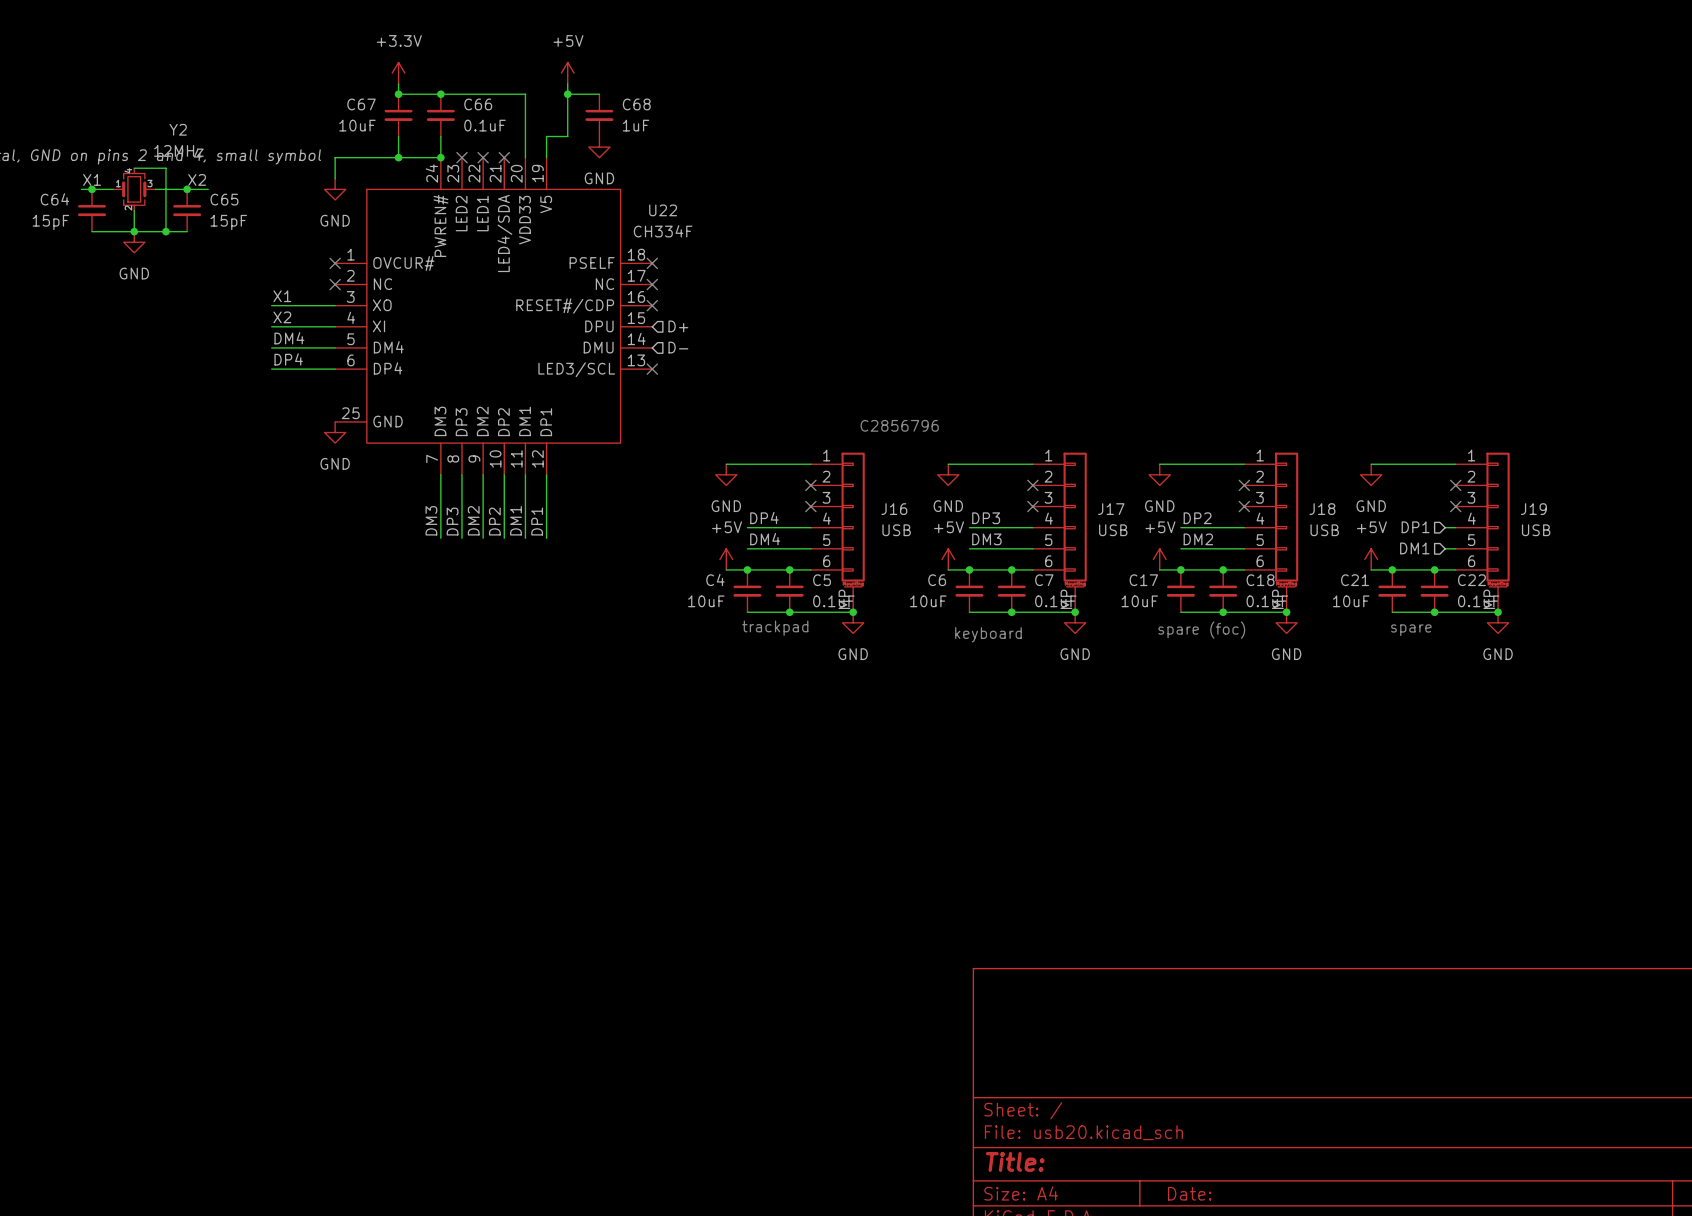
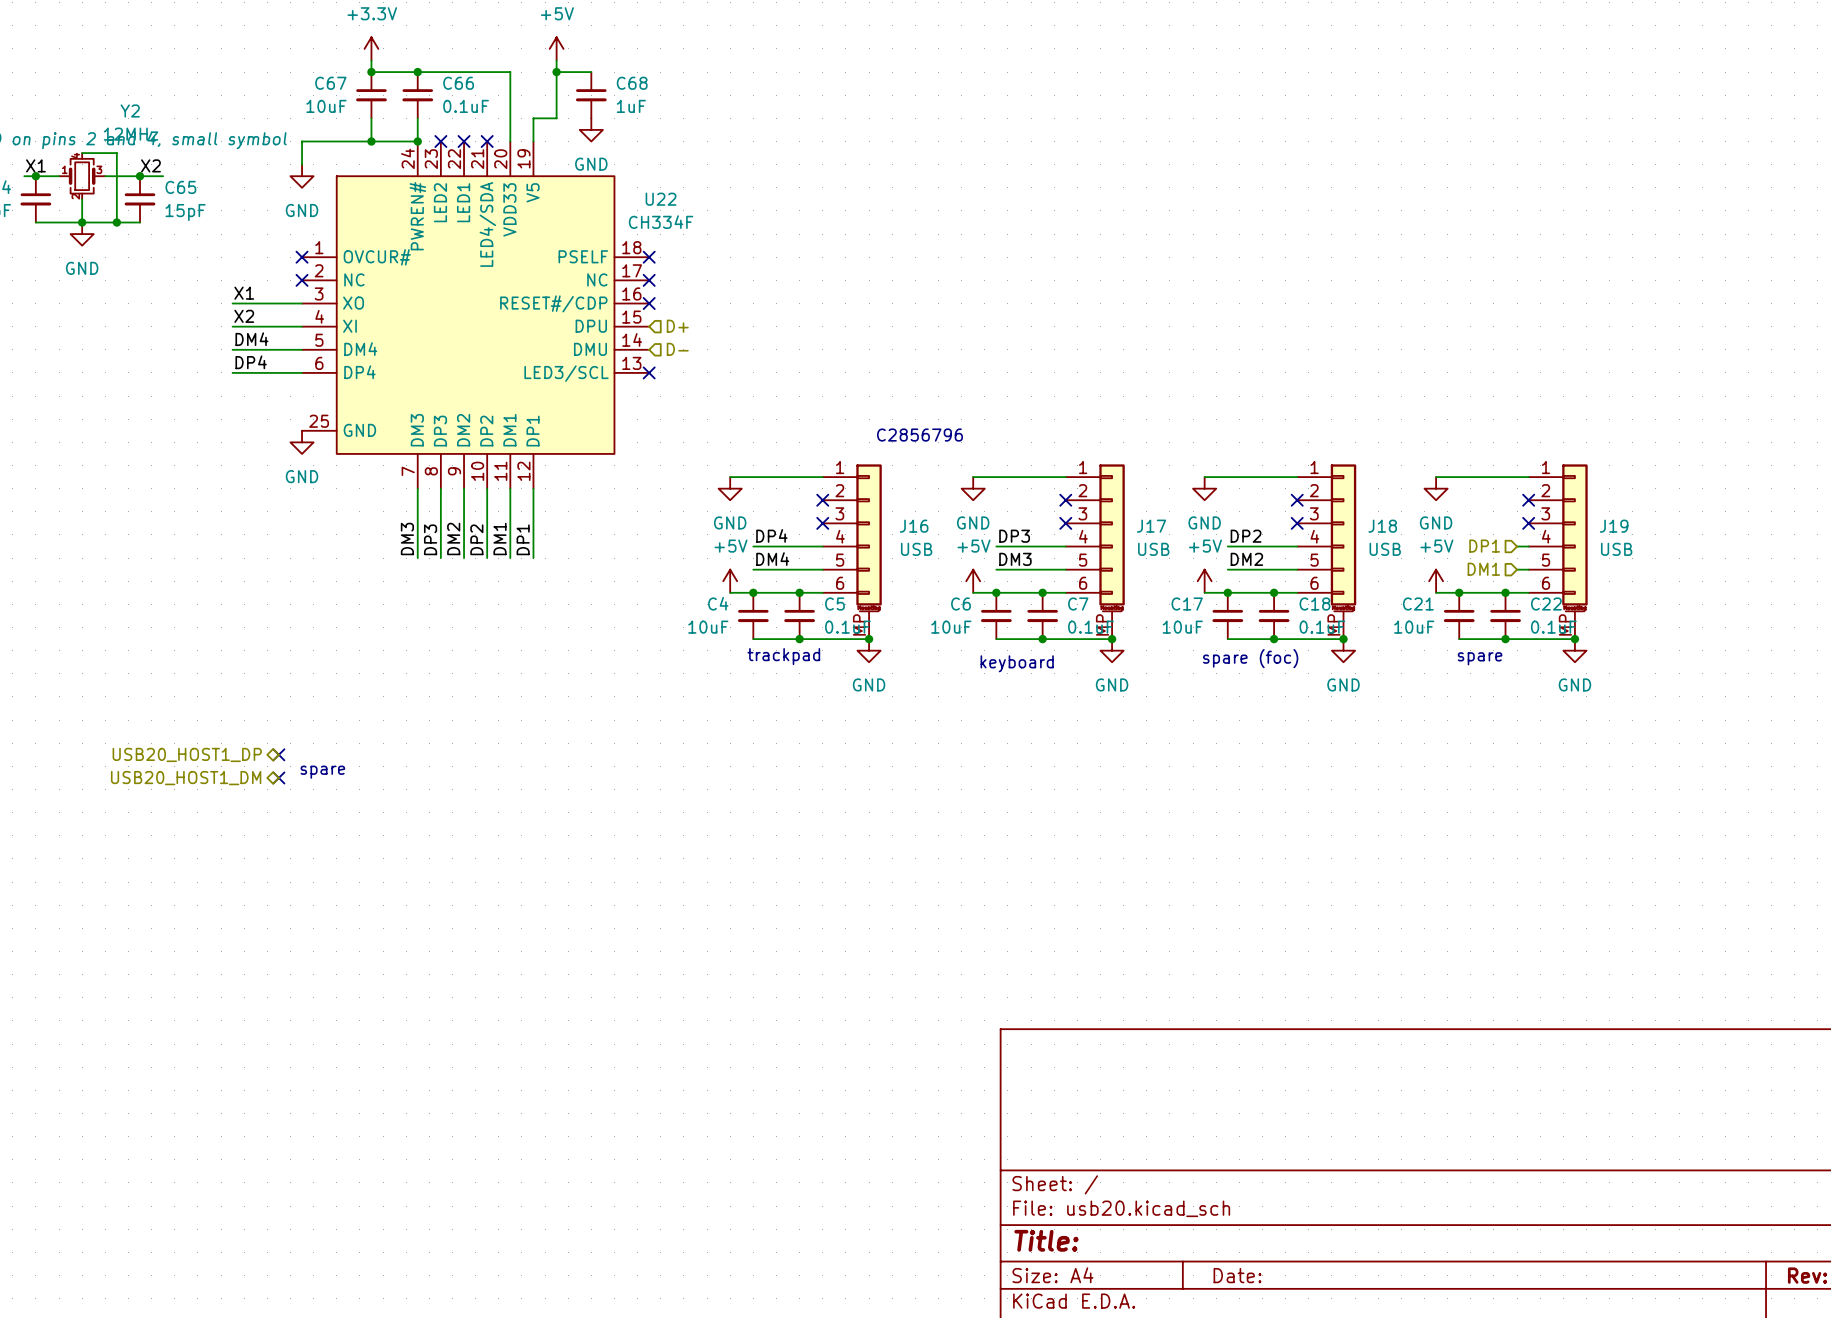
no-connect mark: none -> (278, 754)
hierarchical label: none -> USB20_HOST1_DP (187, 754)
text: none -> spare (322, 772)
hierarchical label: none -> USB20_HOST1_DM (186, 778)
no-connect mark: none -> (278, 777)

